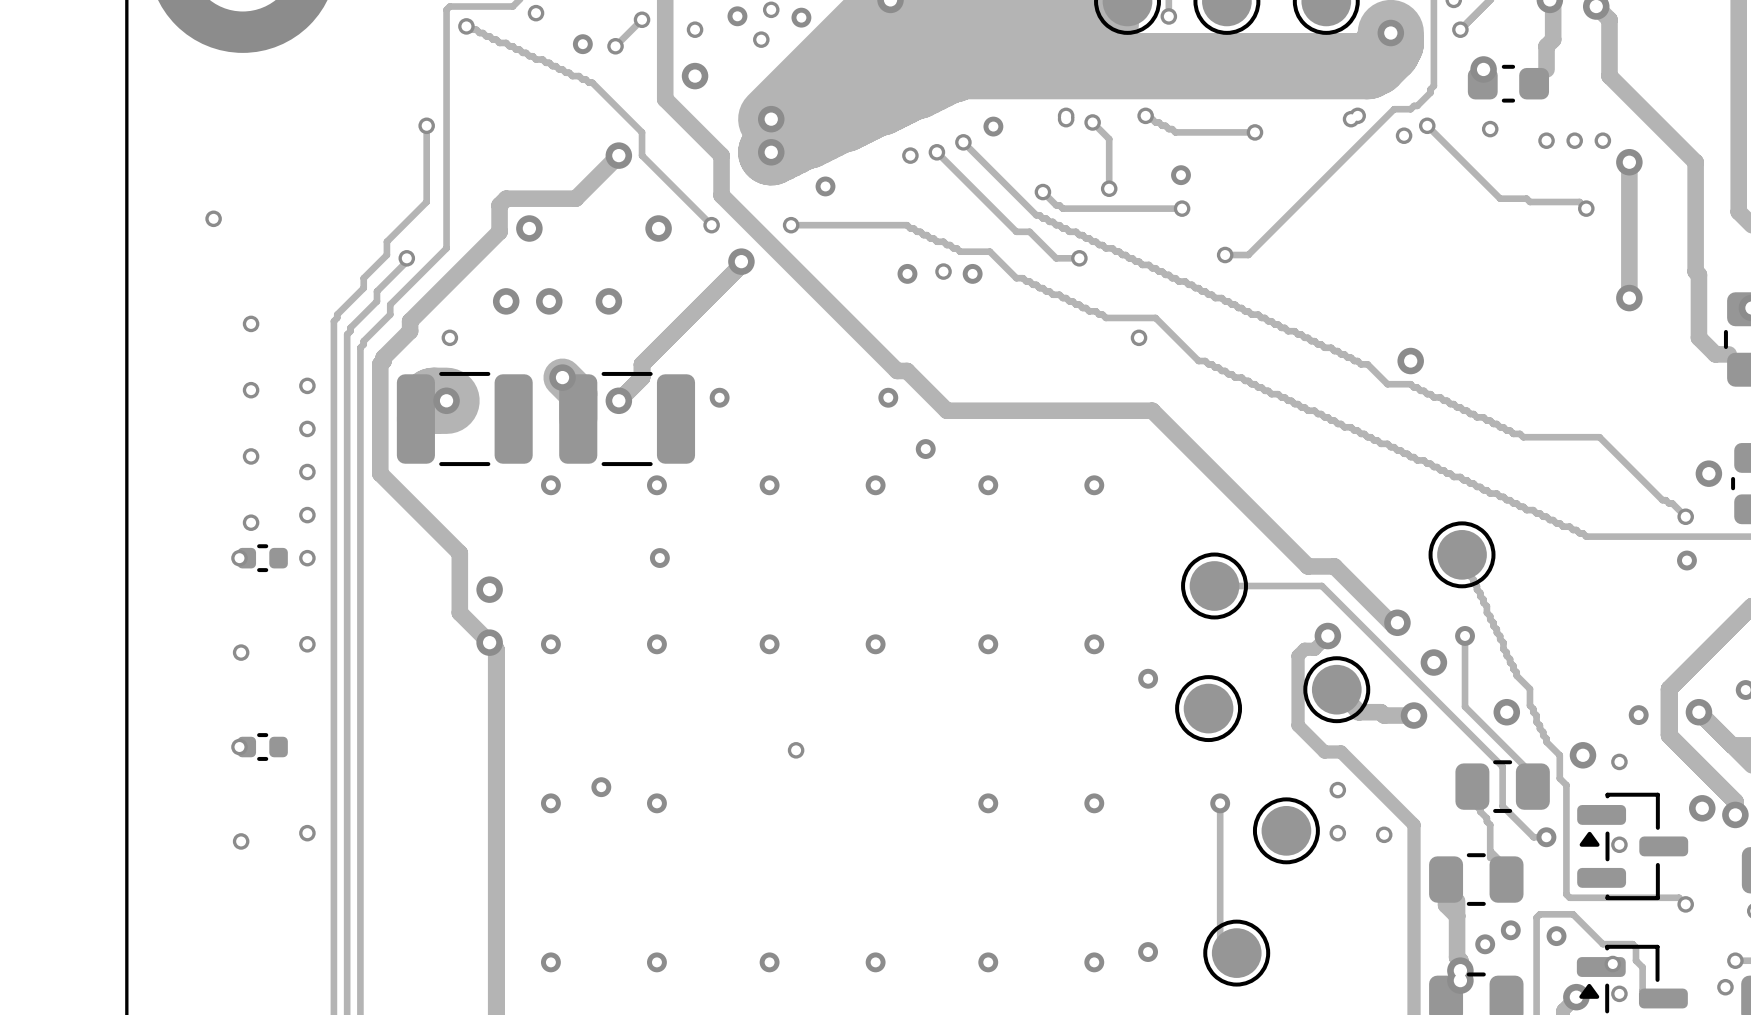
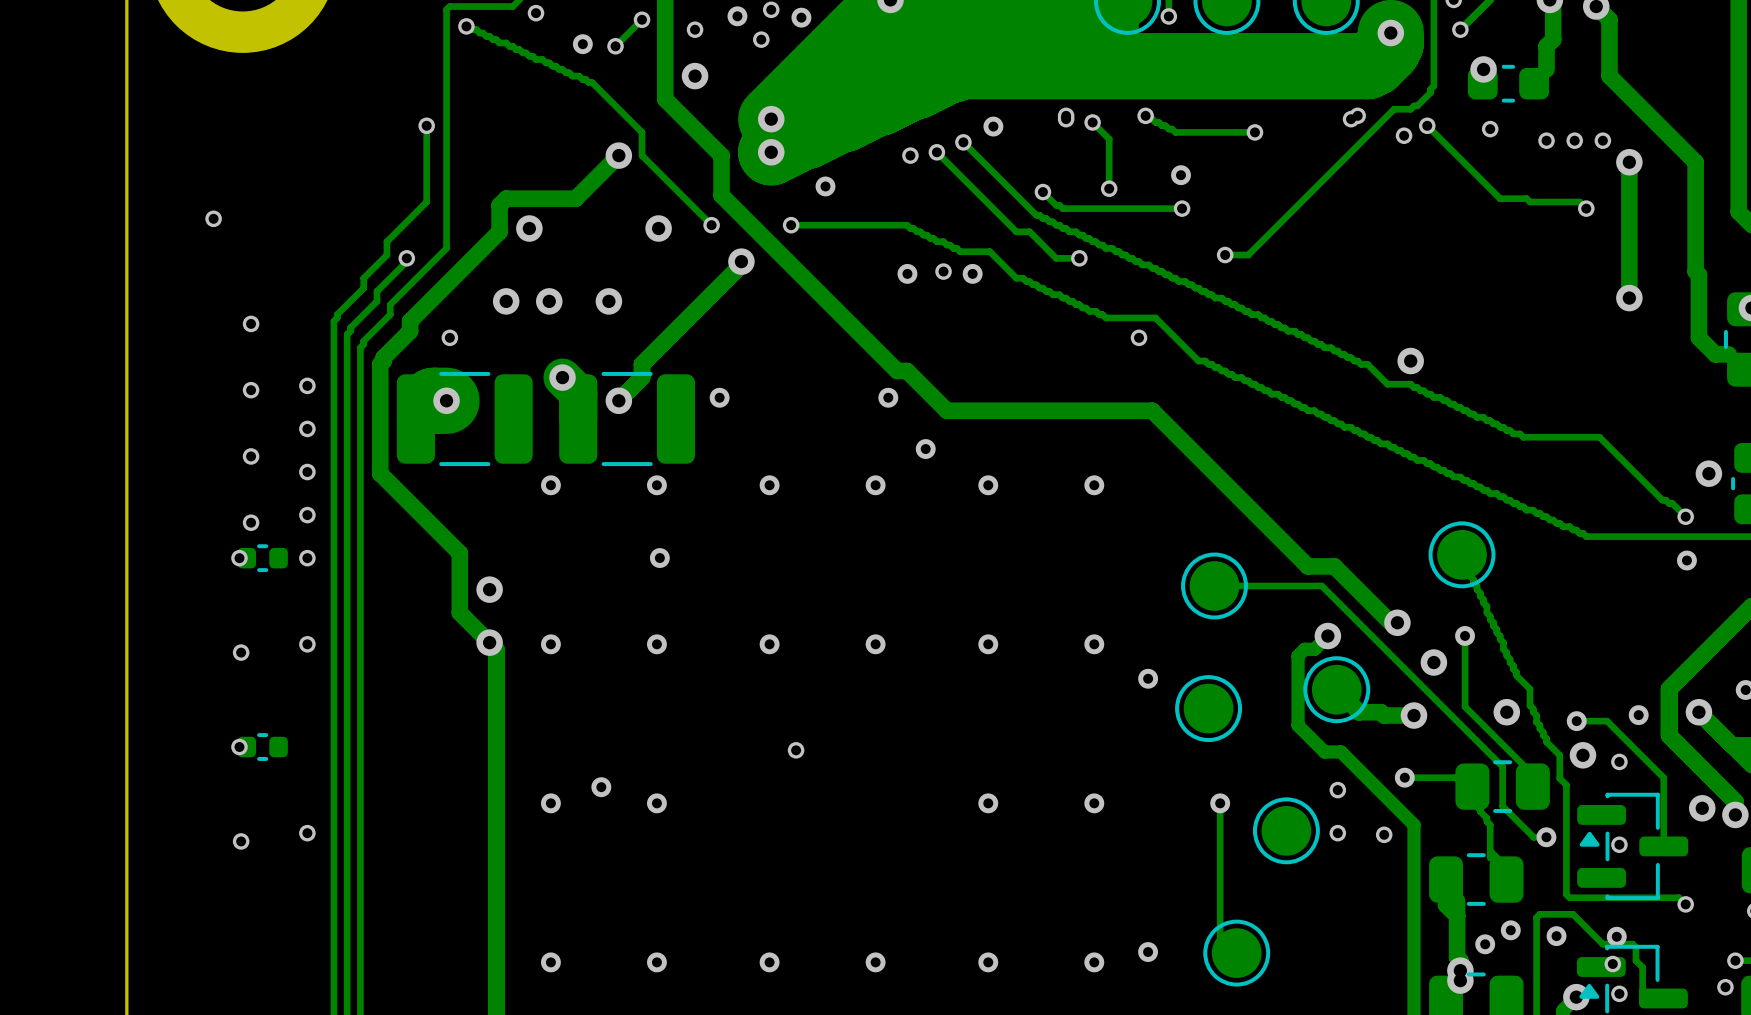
track: none -> (1576, 721) (1607, 721) (1663, 777) (1663, 846)
via: none -> (1576, 721)
track: none -> (1404, 777) (1455, 777) (1472, 794)
via: none -> (1404, 777)
via: none -> (1616, 936)

